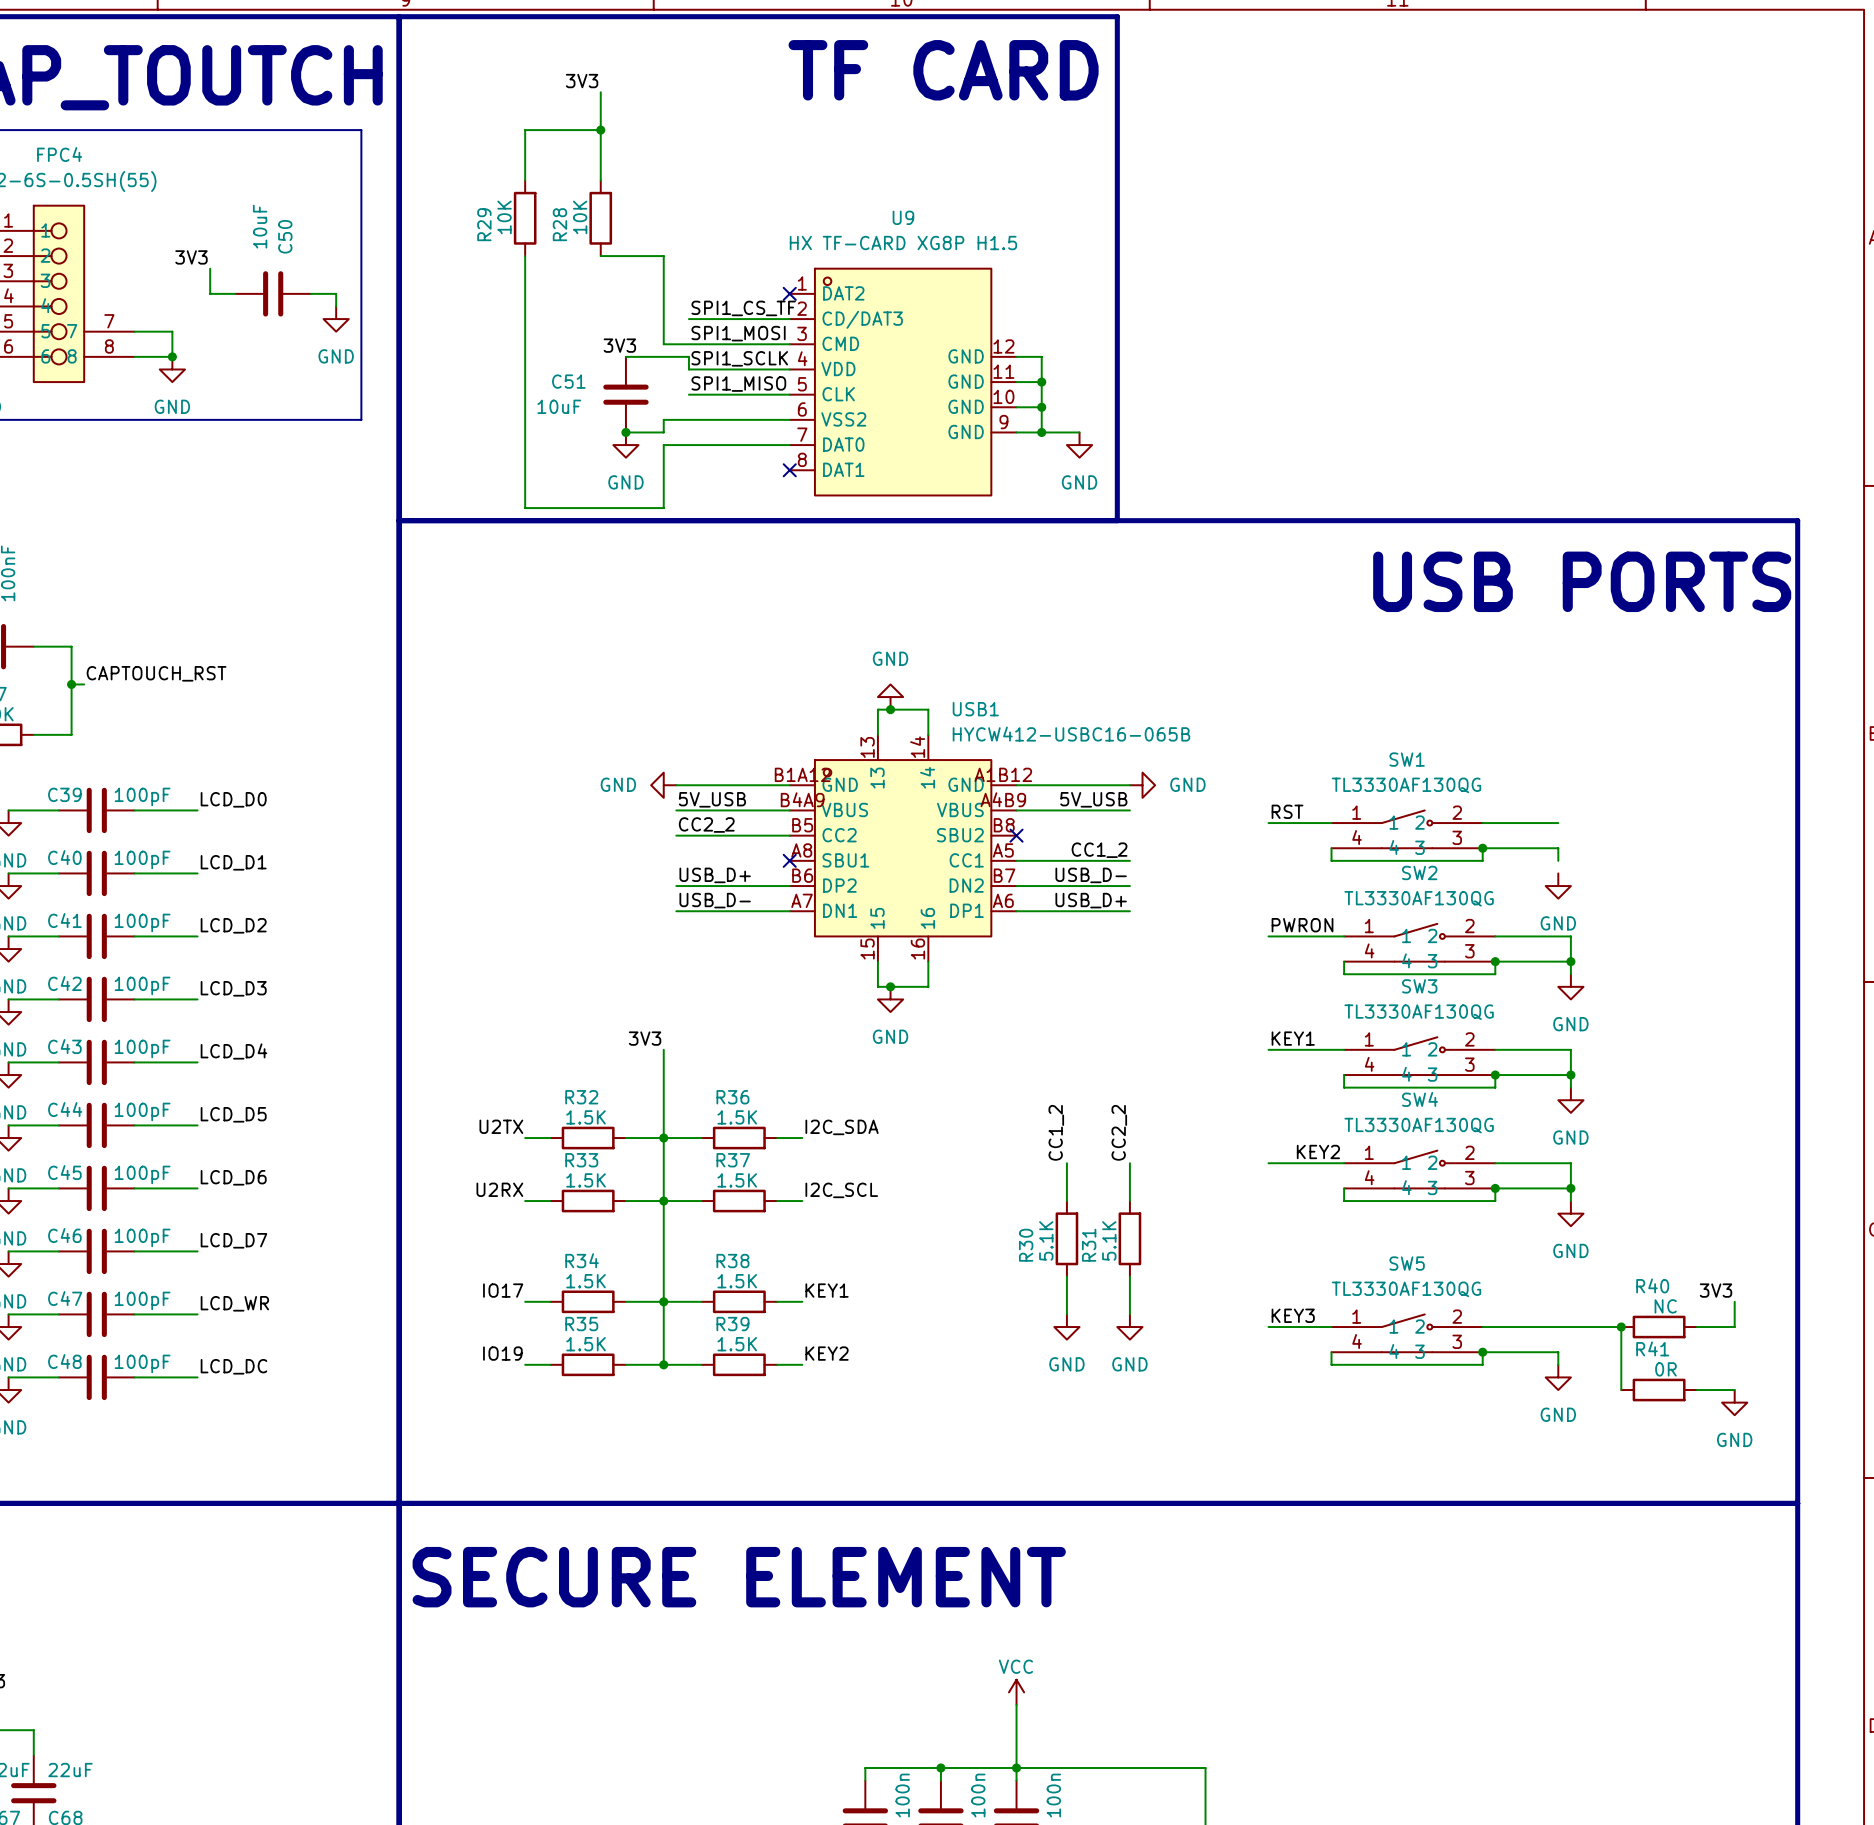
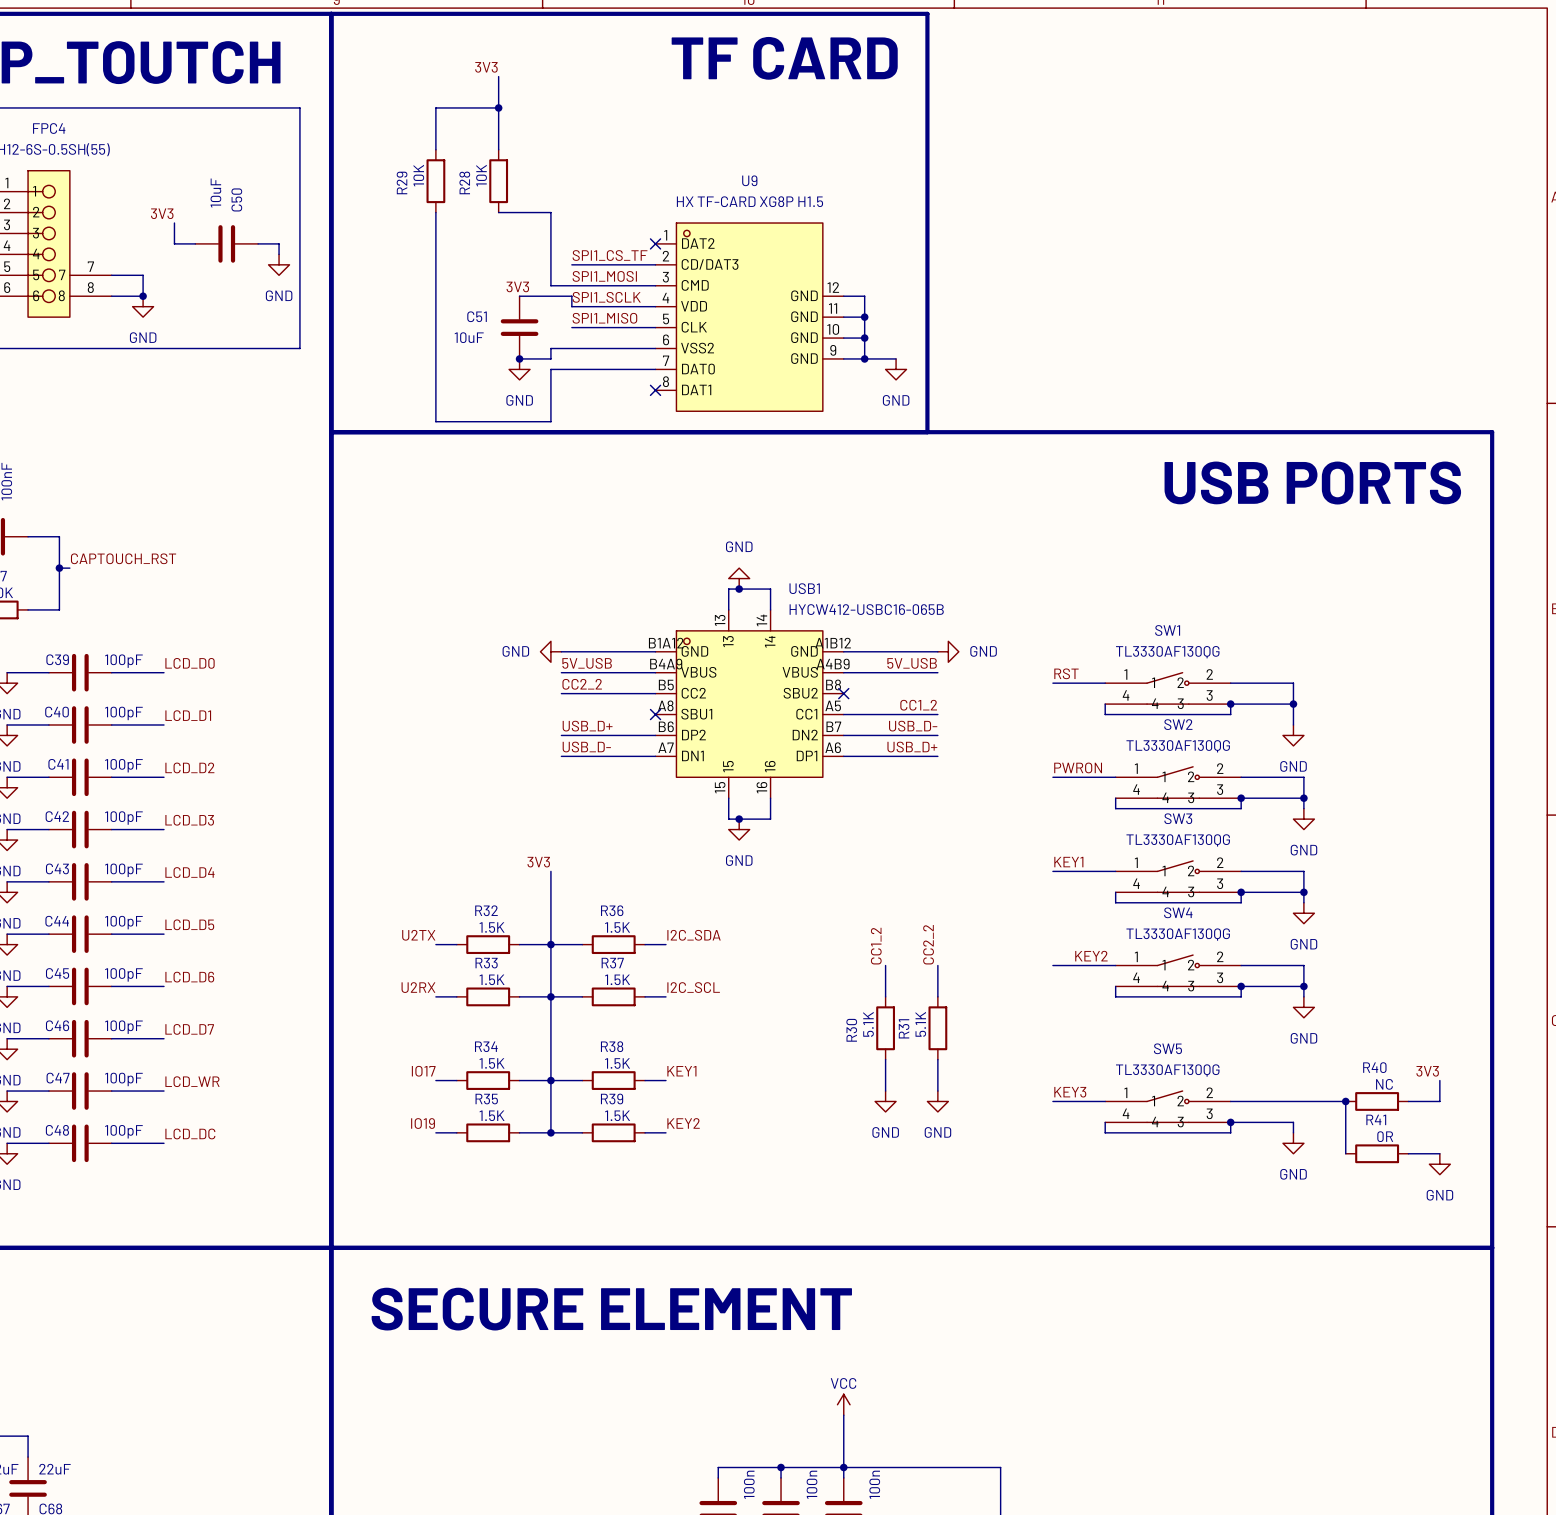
wire: none -> (1293, 683) (1293, 704)
junction: none -> (1293, 704)
wire: none -> (1293, 714) (1293, 724)

